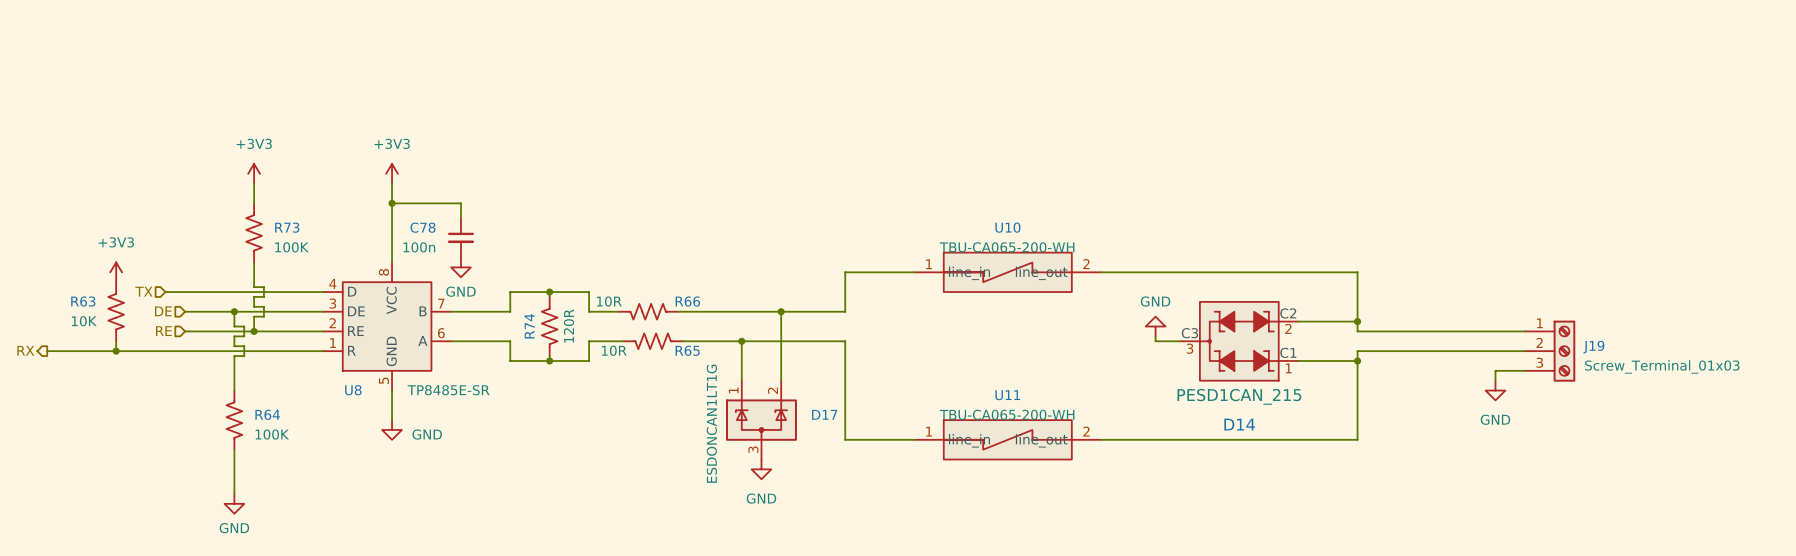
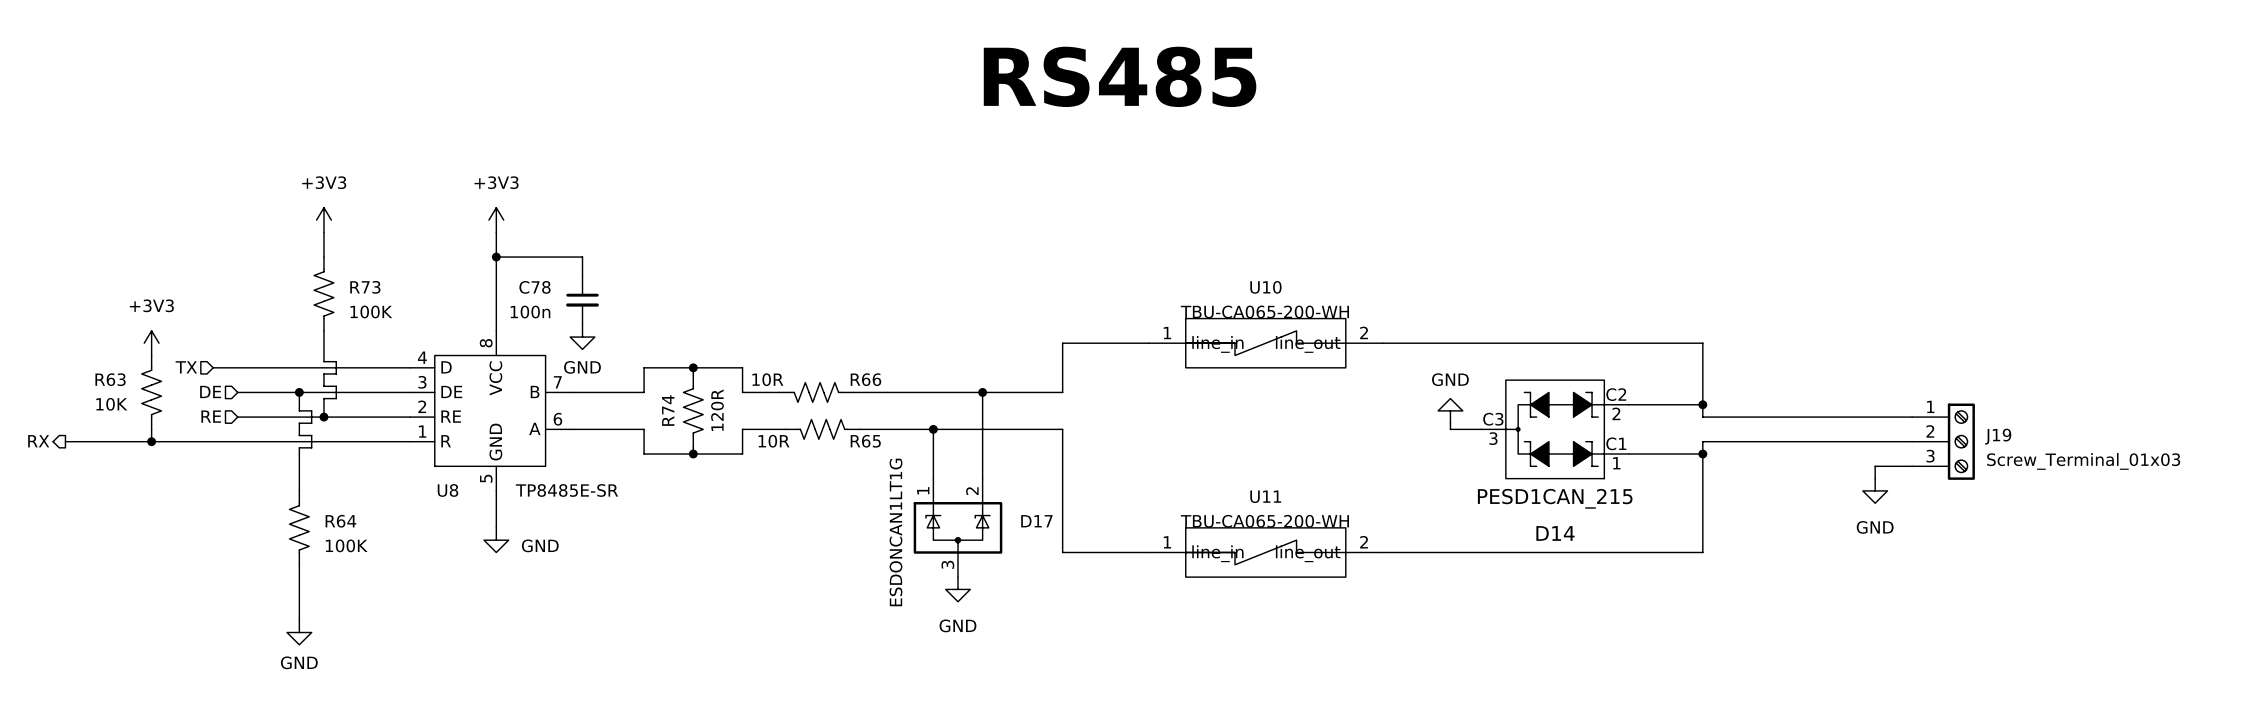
text: none -> RS485 (1120, 76)

